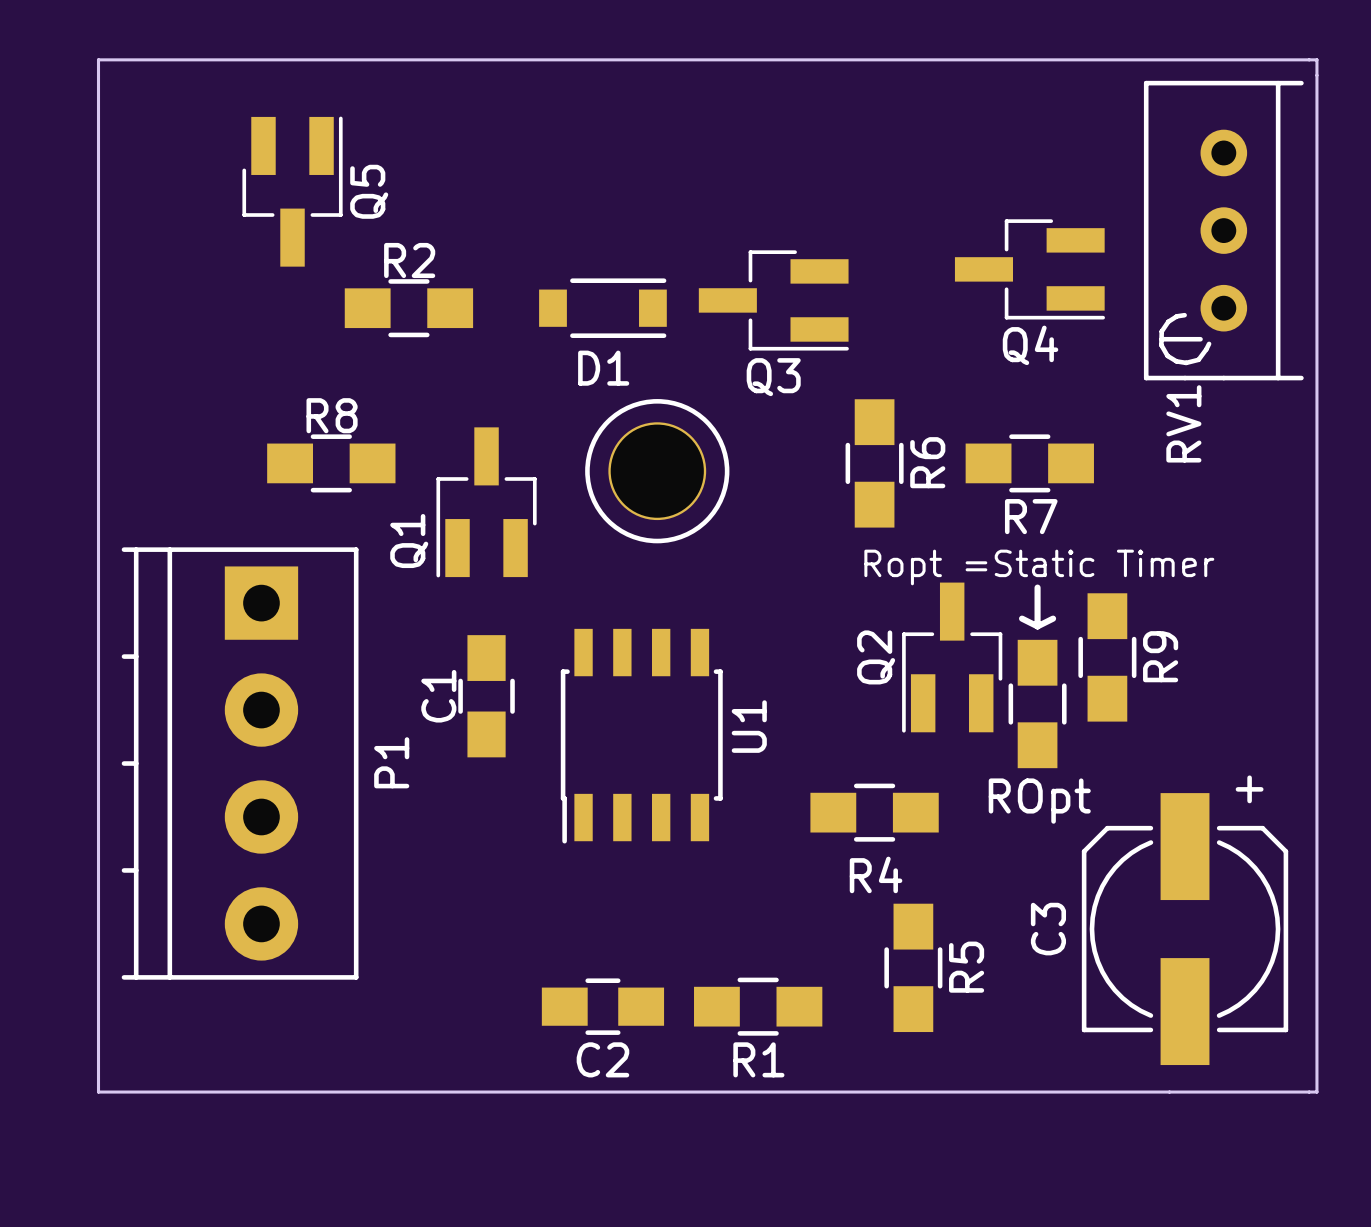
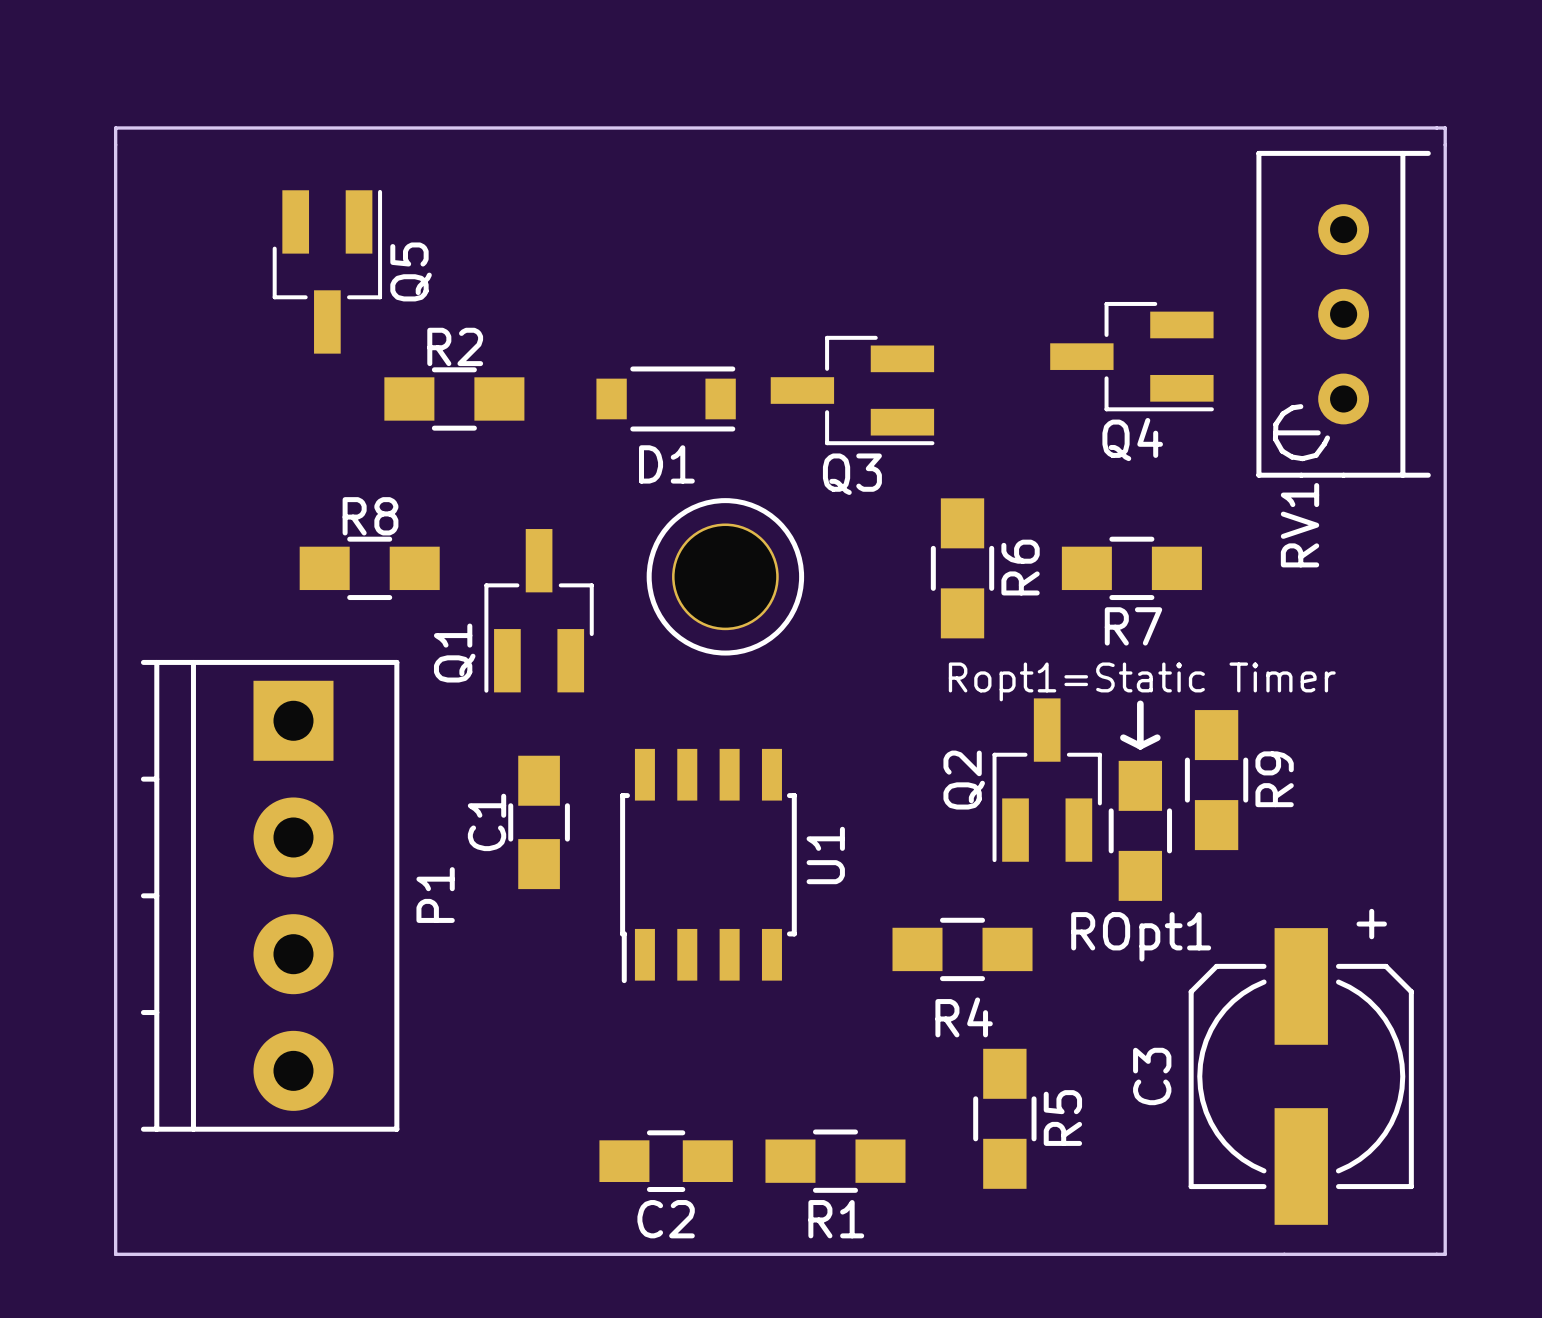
text: Ropt =Static Timer (1039, 567) -> Ropt1=Static Timer (1142, 681)
ROpt name: ROpt (1039, 801) -> ROpt1 (1141, 936)

